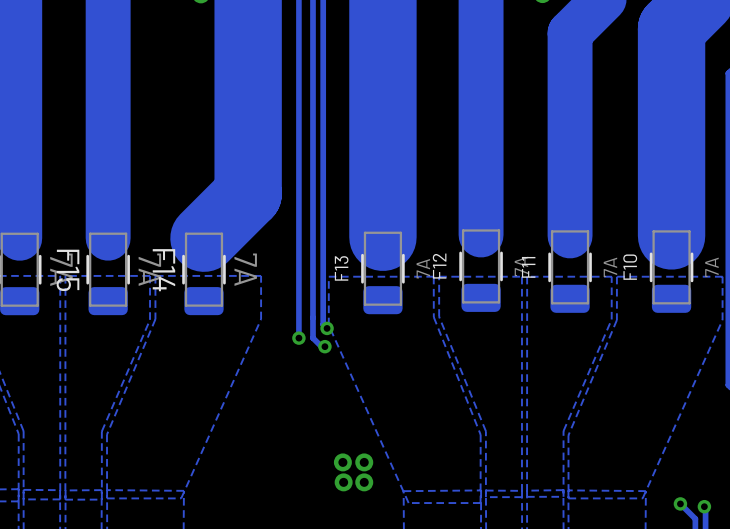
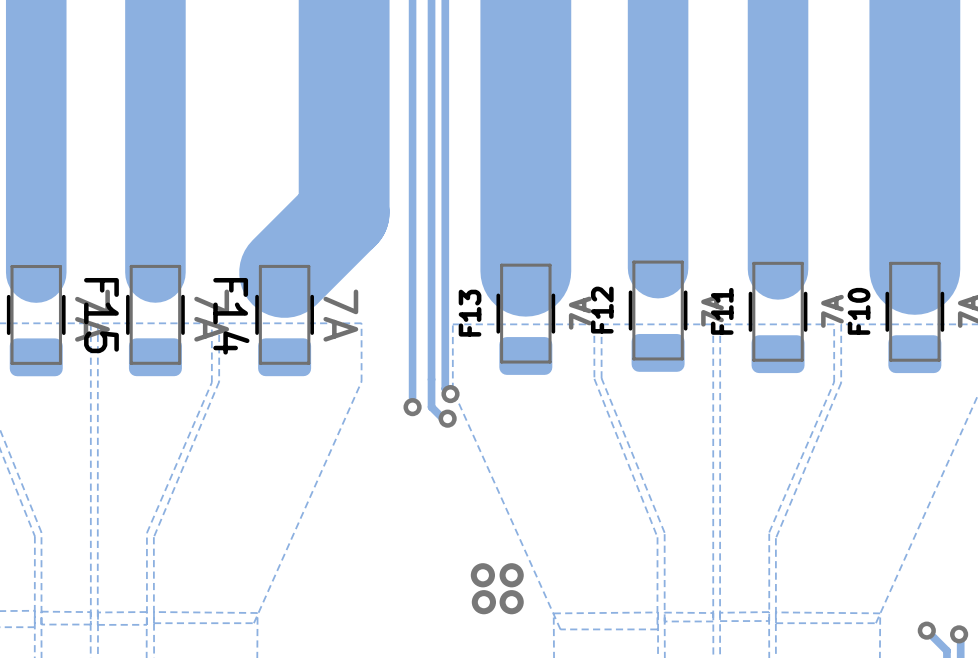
via: (342, 462) -> none
via: none -> (482, 575)
via: (364, 462) -> none
via: none -> (511, 575)
via: (343, 482) -> none
via: none -> (483, 602)
via: (364, 482) -> none
via: none -> (511, 602)

